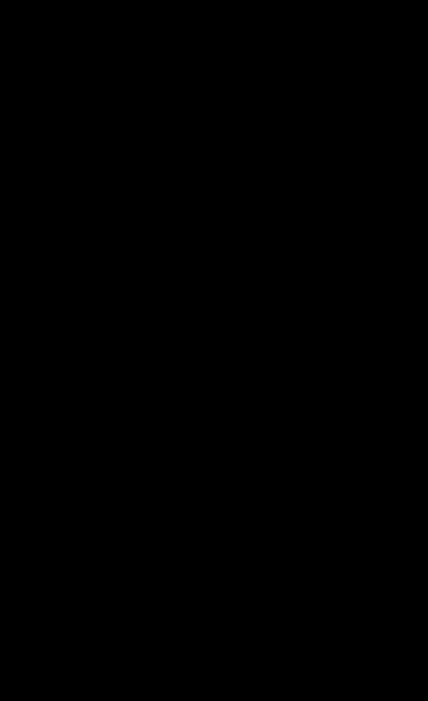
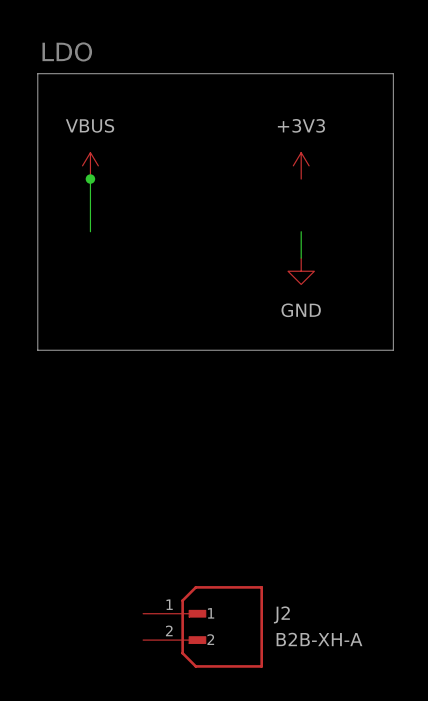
text: none -> LDO (67, 51)
line: none -> (37, 73) (393, 73) (393, 350) (37, 350) (37, 73)
power symbol: none -> VBUS (90, 165)
power symbol: none -> +3V3 (301, 165)
wire: none -> (90, 179) (90, 231)
junction: none -> (90, 179)
wire: none -> (301, 231) (301, 258)
power symbol: none -> GND (301, 271)
J2: none -> B2B-XH-A (203, 626)

